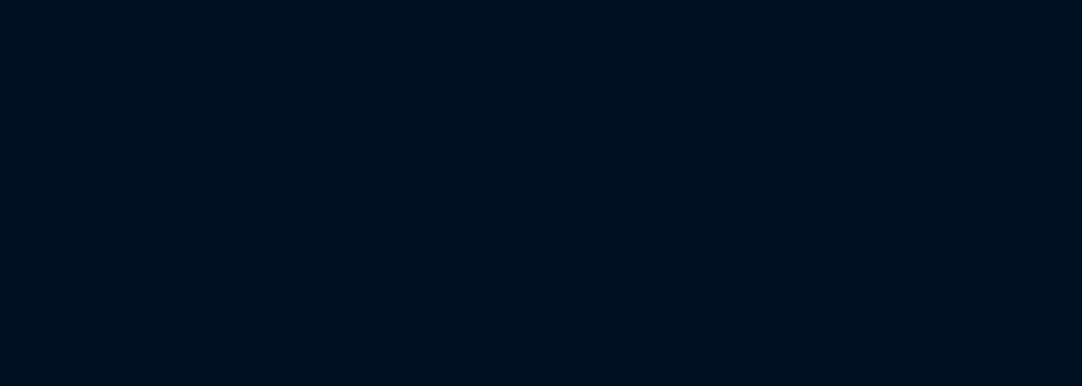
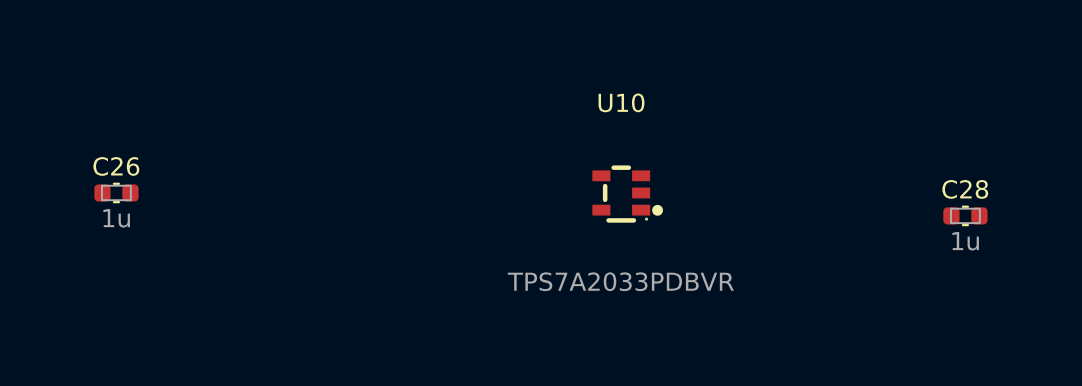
C26: none -> 1u (116, 192)
U10: none -> TPS7A2033PDBVR (627, 194)
C28: none -> 1u (965, 215)

